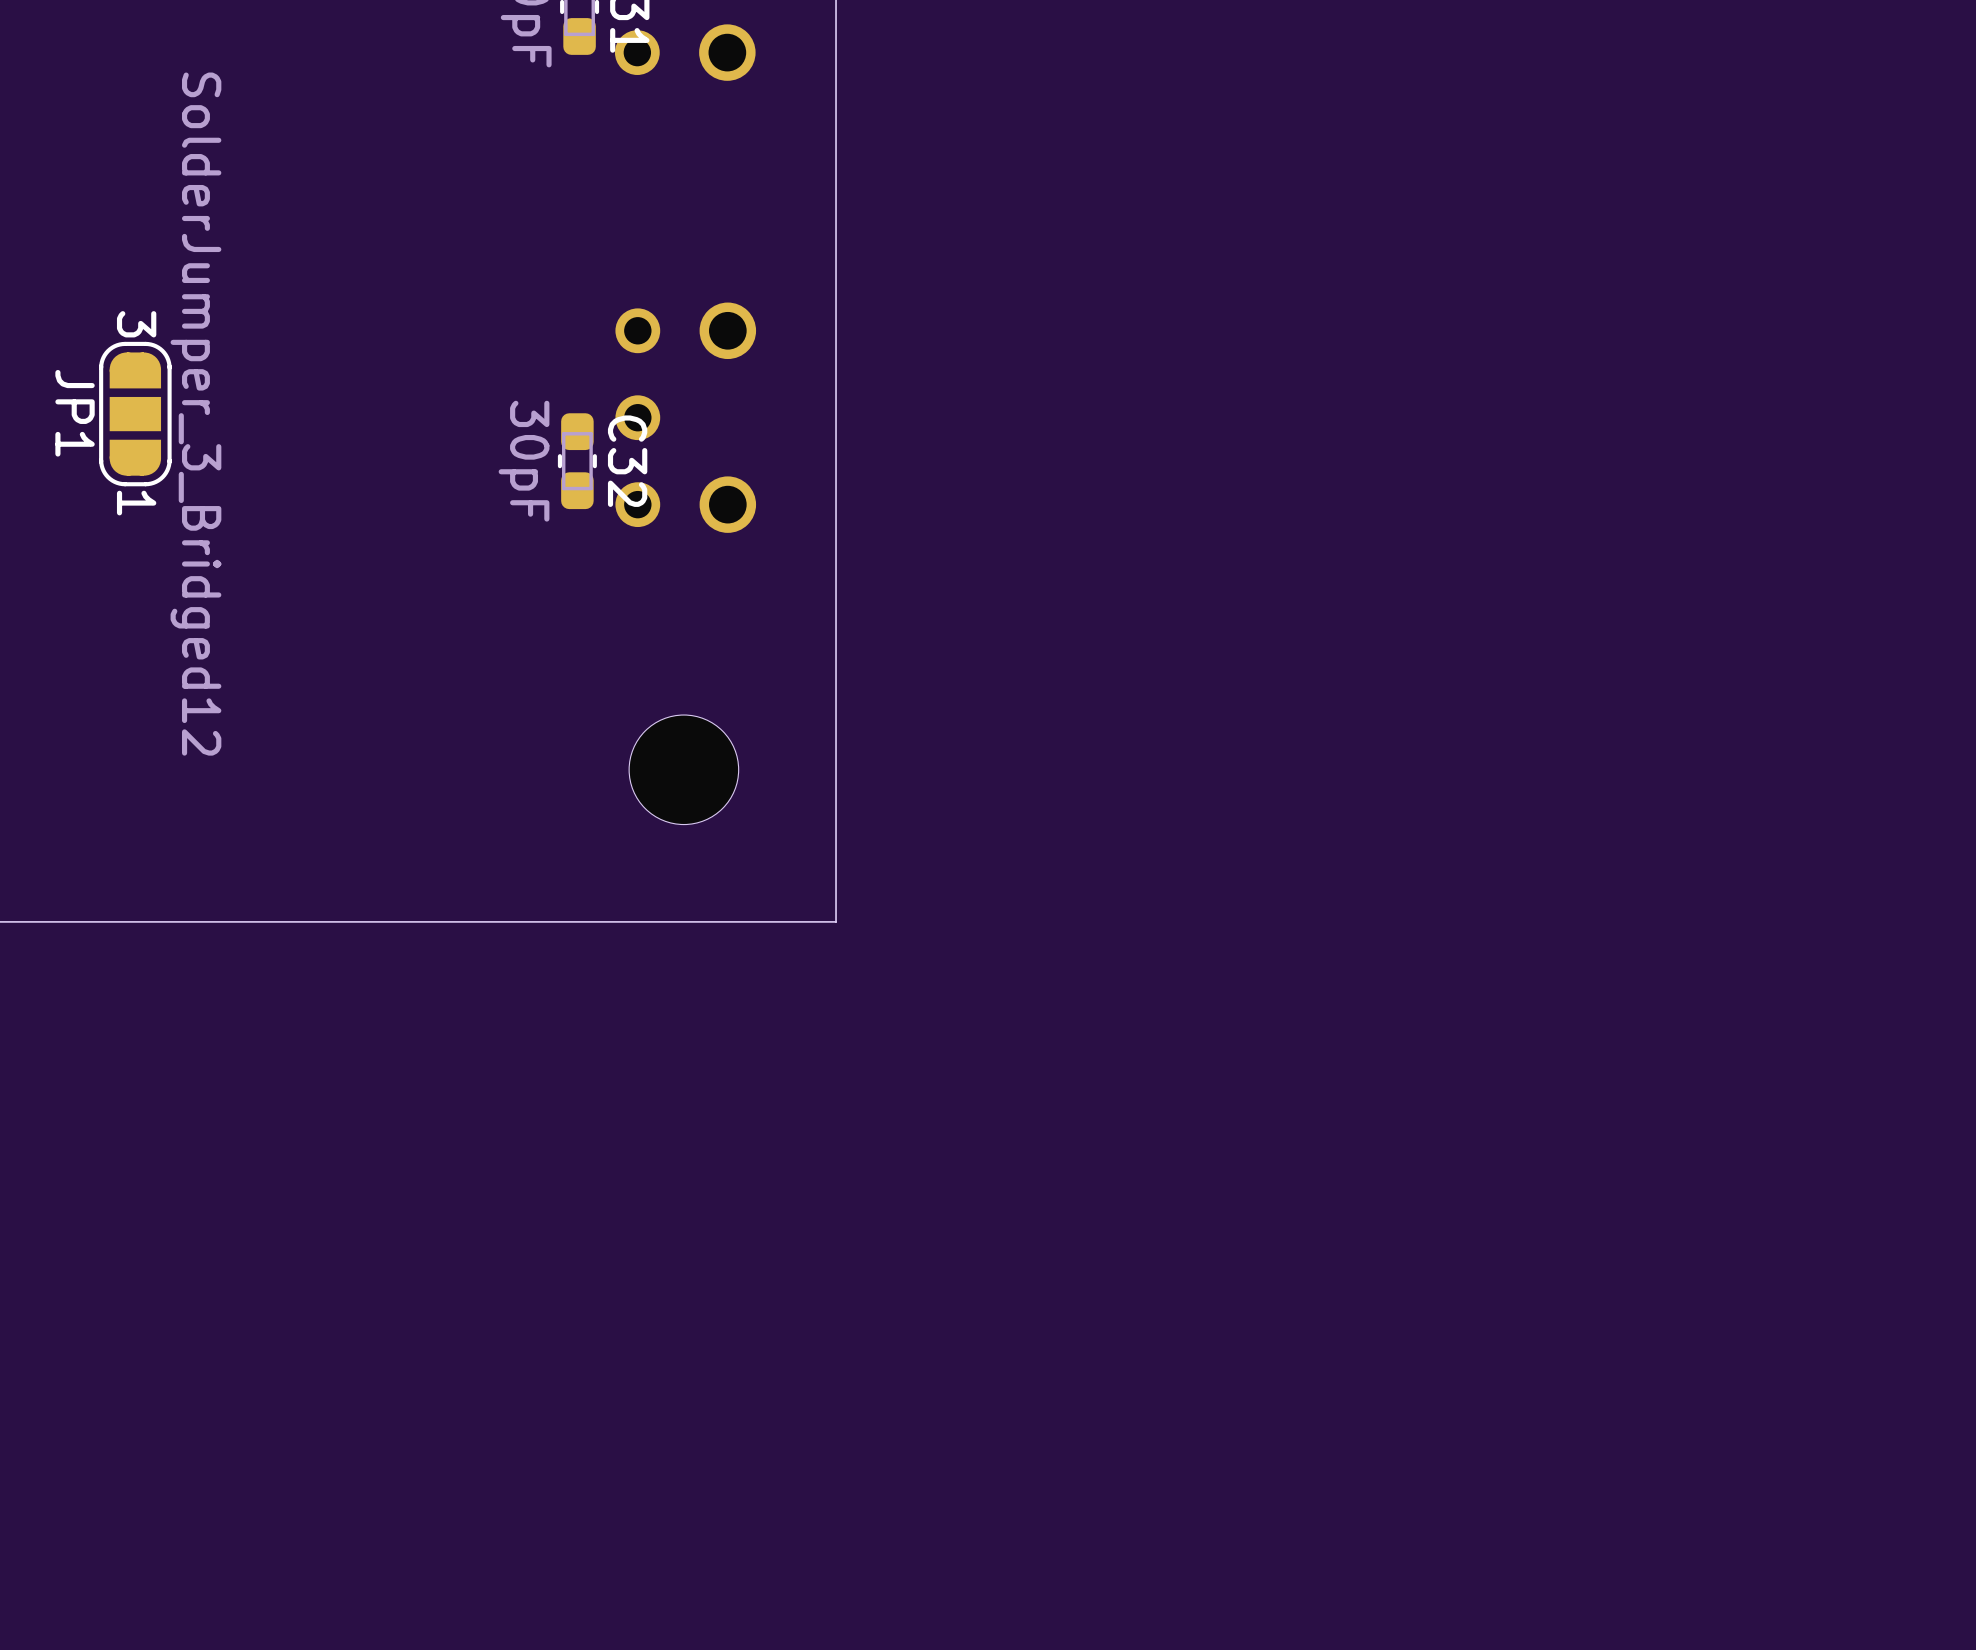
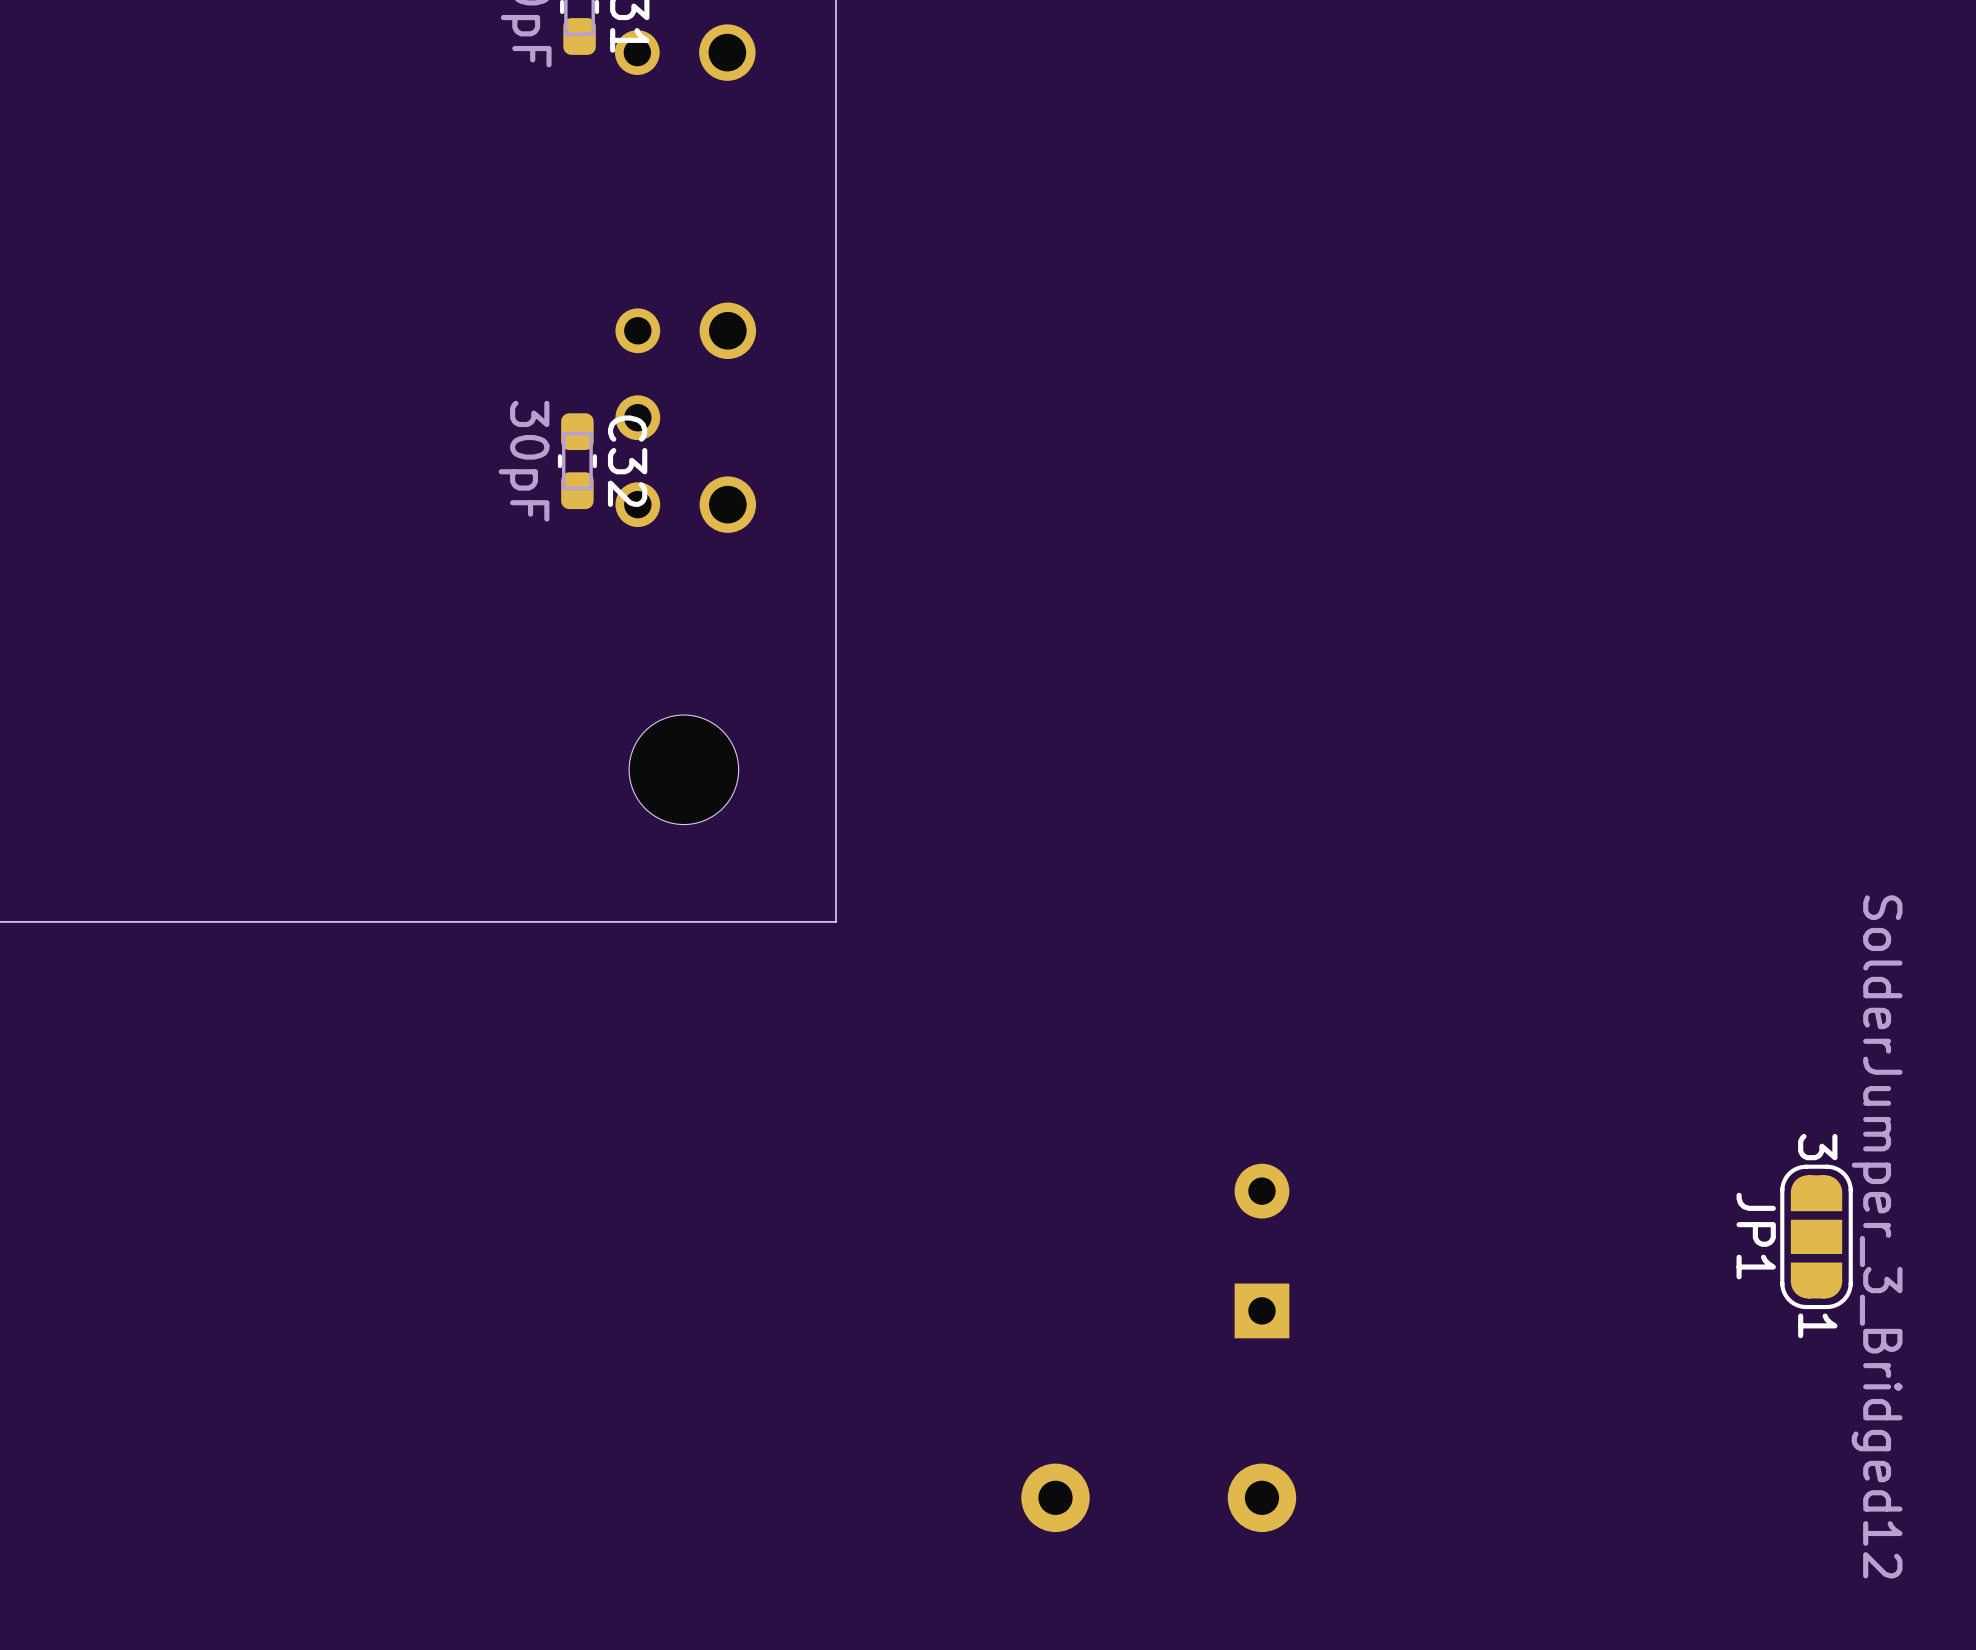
JP1 position: (135, 414) -> (1816, 1236)
part: none -> (1261, 1251)
part: none -> (1055, 1497)
part: none -> (1261, 1497)

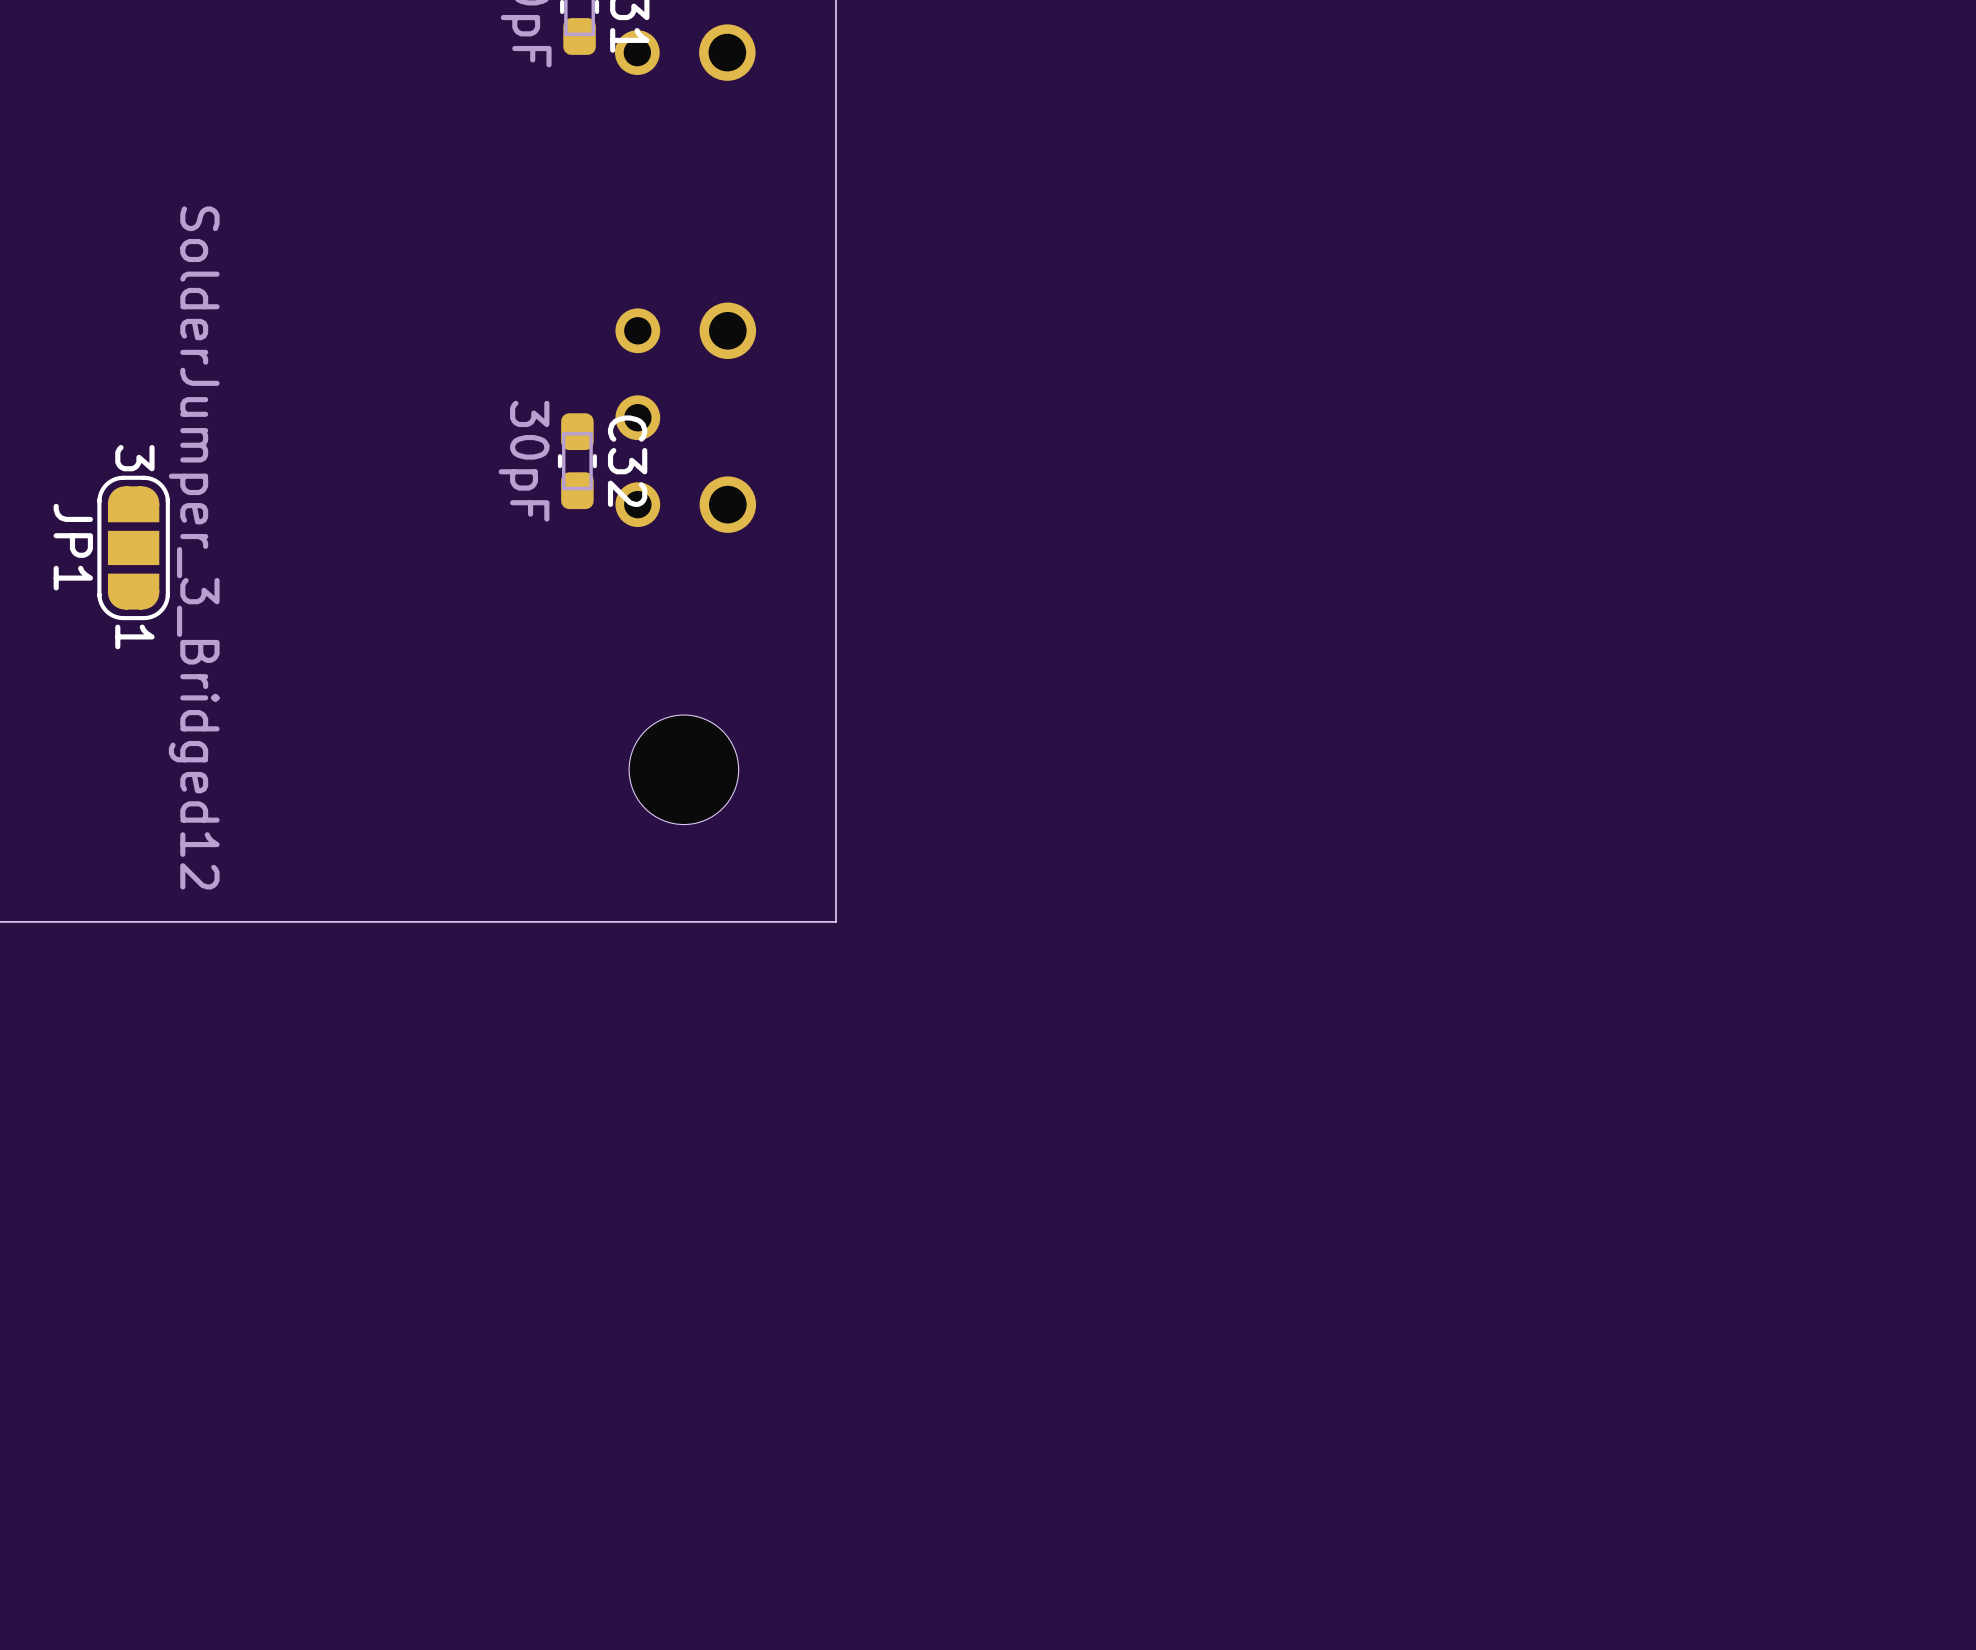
JP1 position: (1816, 1236) -> (133, 547)
part: (1261, 1251) -> none
part: (1055, 1497) -> none
part: (1261, 1497) -> none

